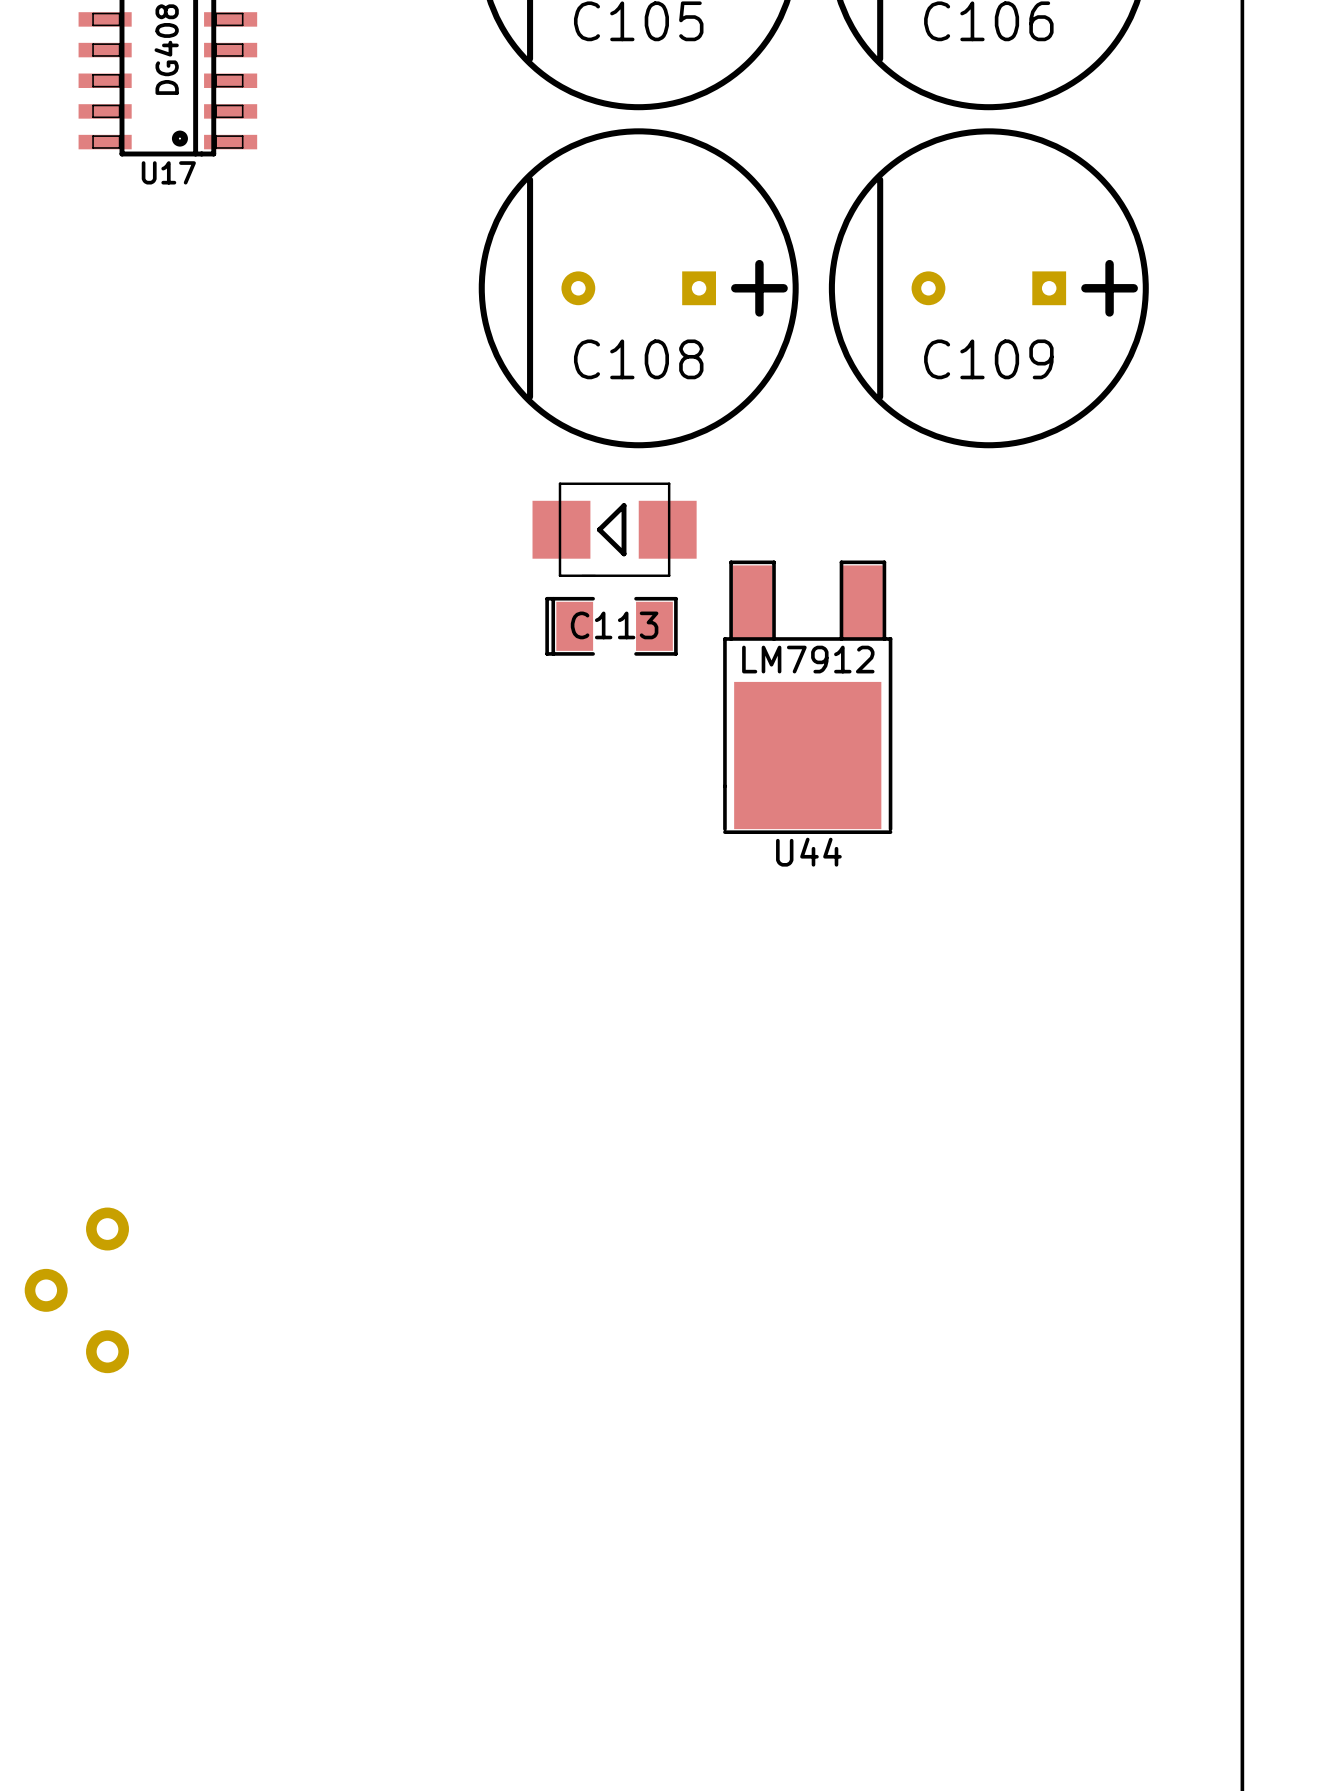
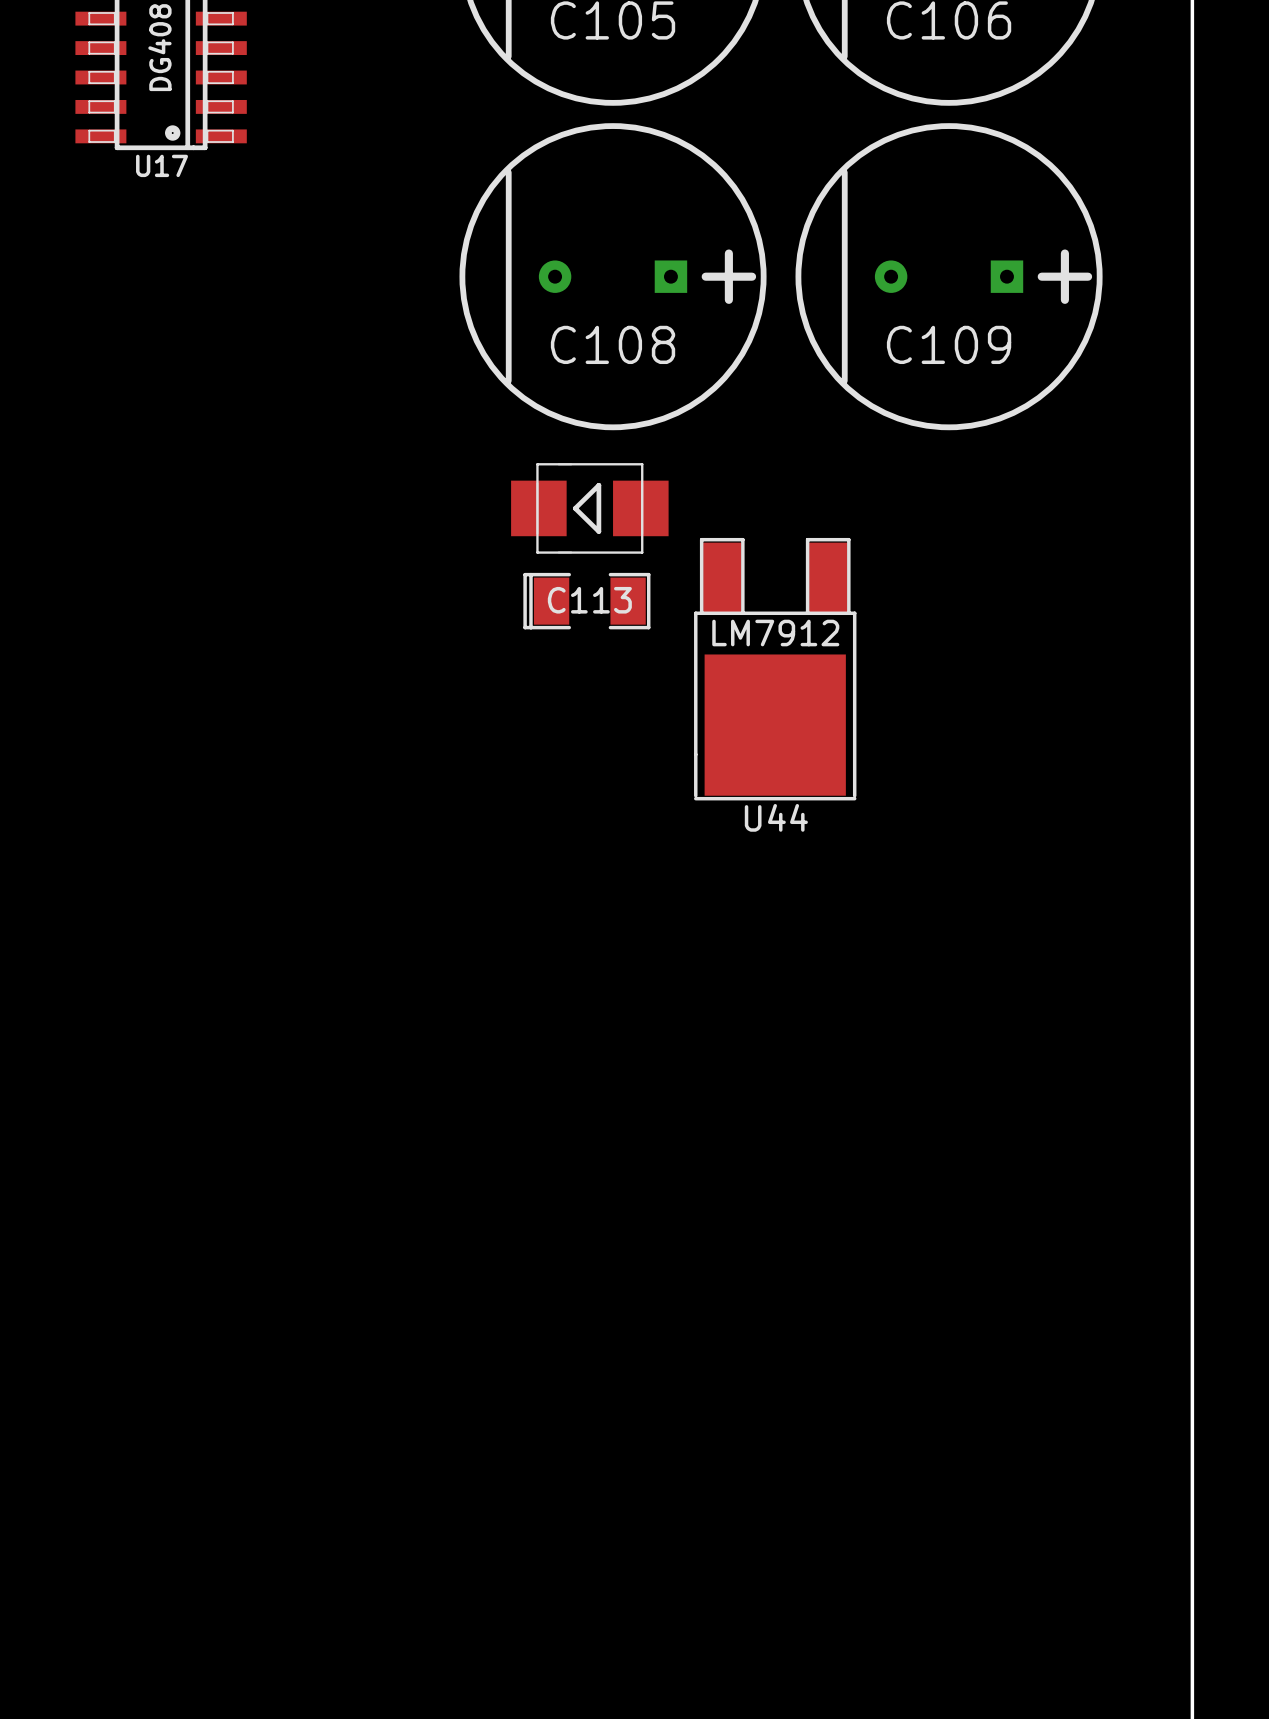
part: (76, 1290) -> none

